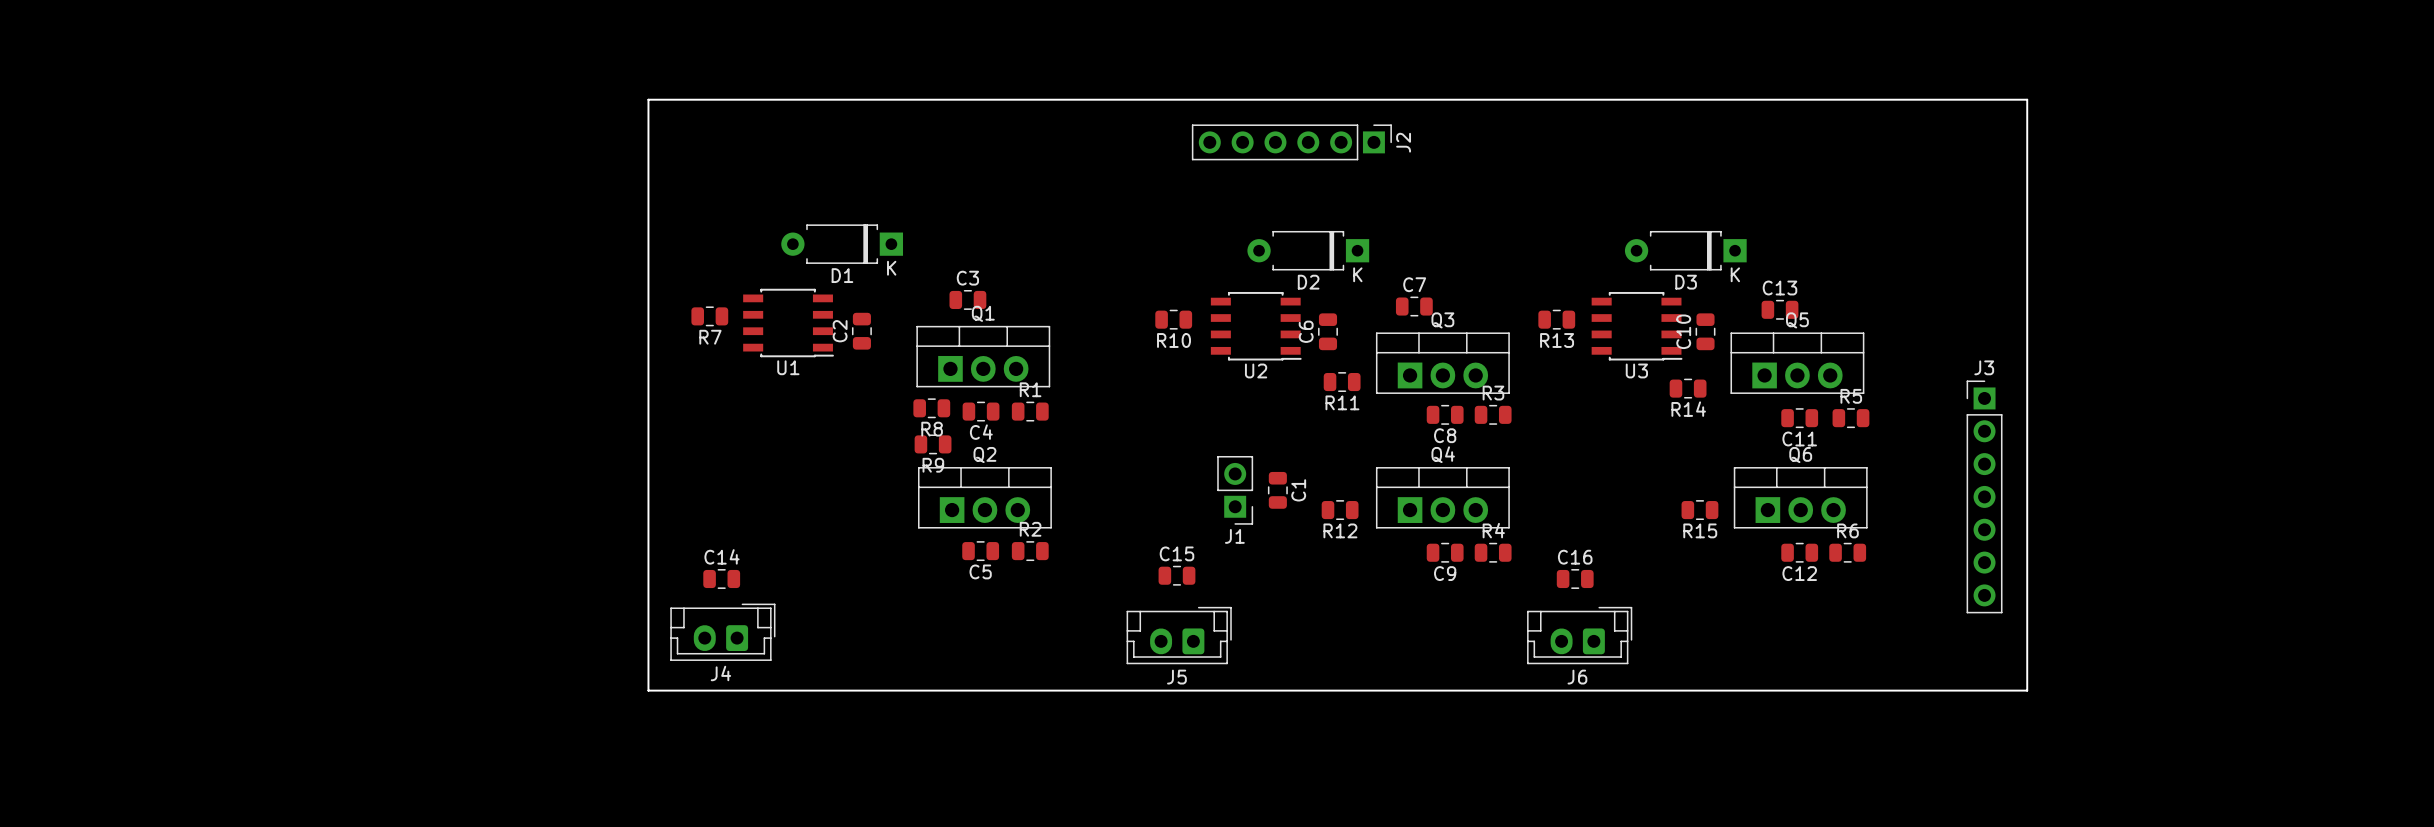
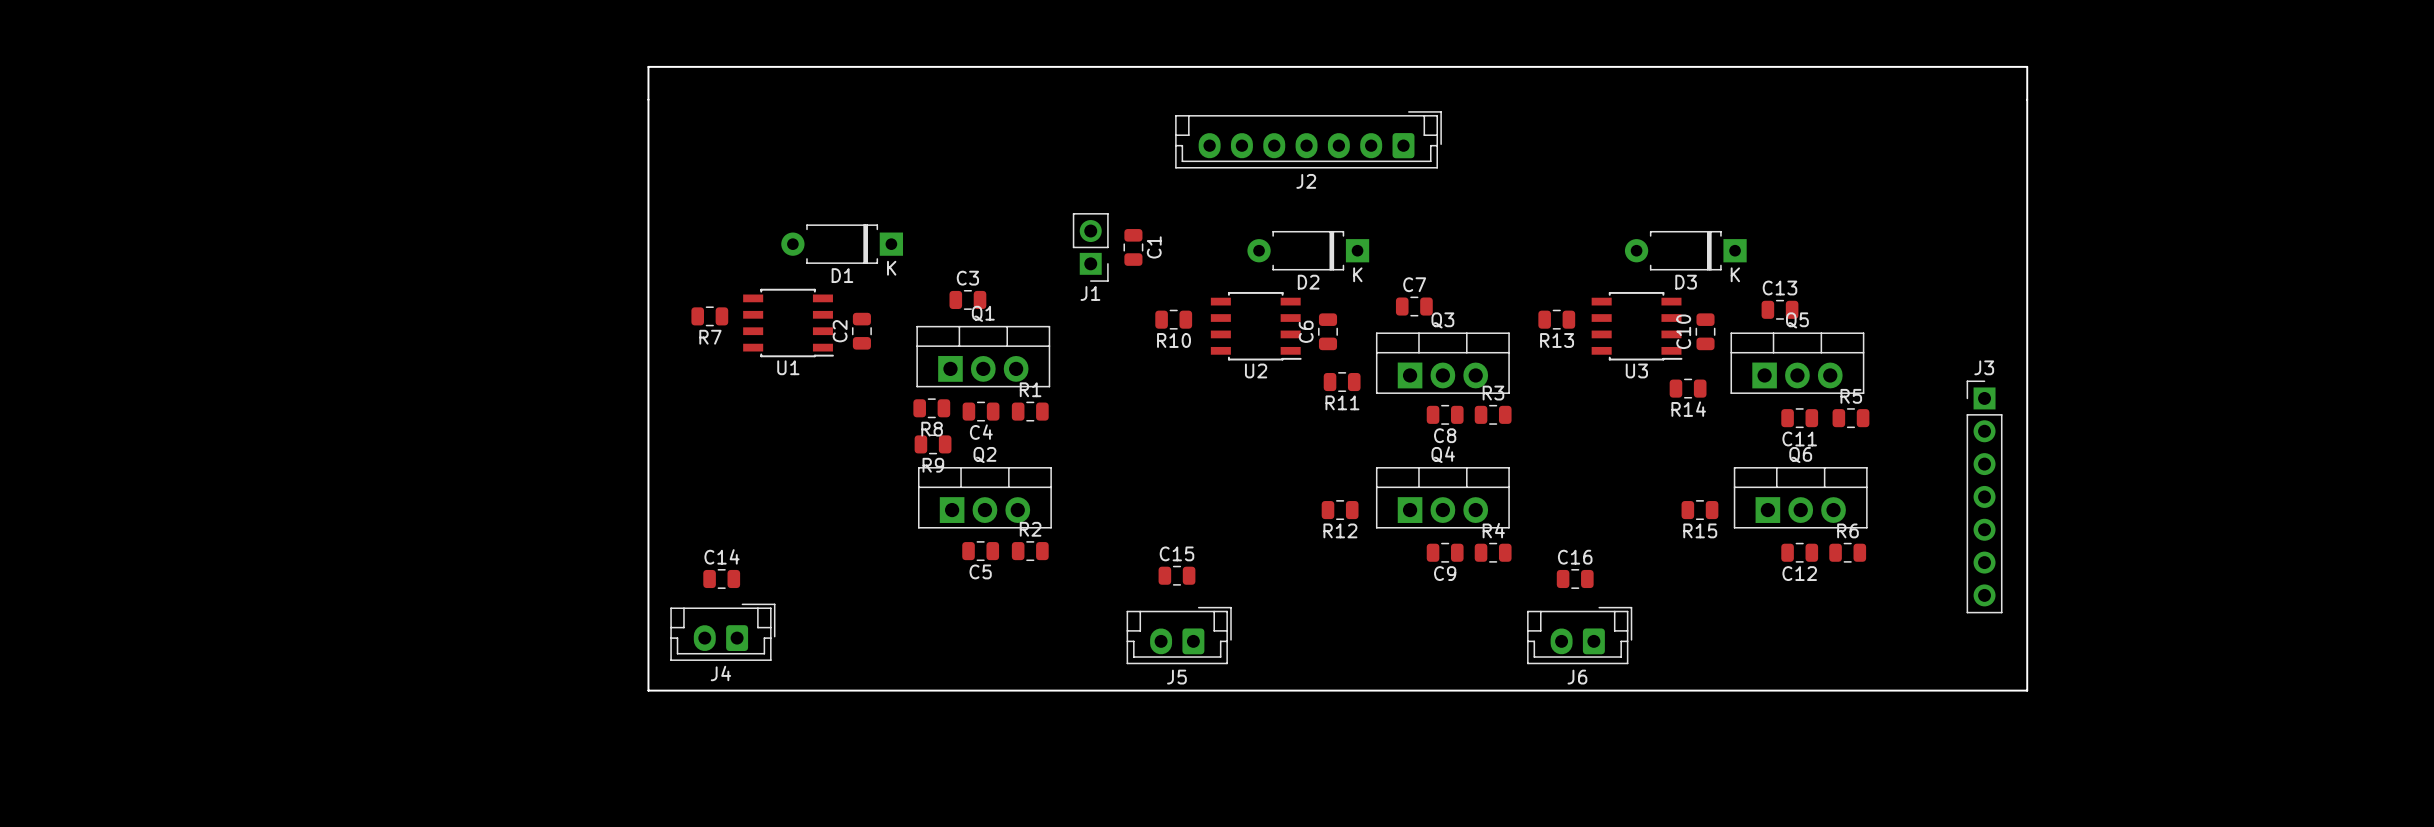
board edge: (648, 99) (2027, 99) -> (648, 99) (648, 66) (2027, 66) (2027, 99)
J2 footprint: [1191, 124, 1392, 161] -> [1175, 111, 1442, 169]
J2 name position: J2 (1403, 142) -> J2 (1306, 181)
J1 position: (1235, 490) -> (1090, 247)
C1 position: (1277, 490) -> (1133, 247)

